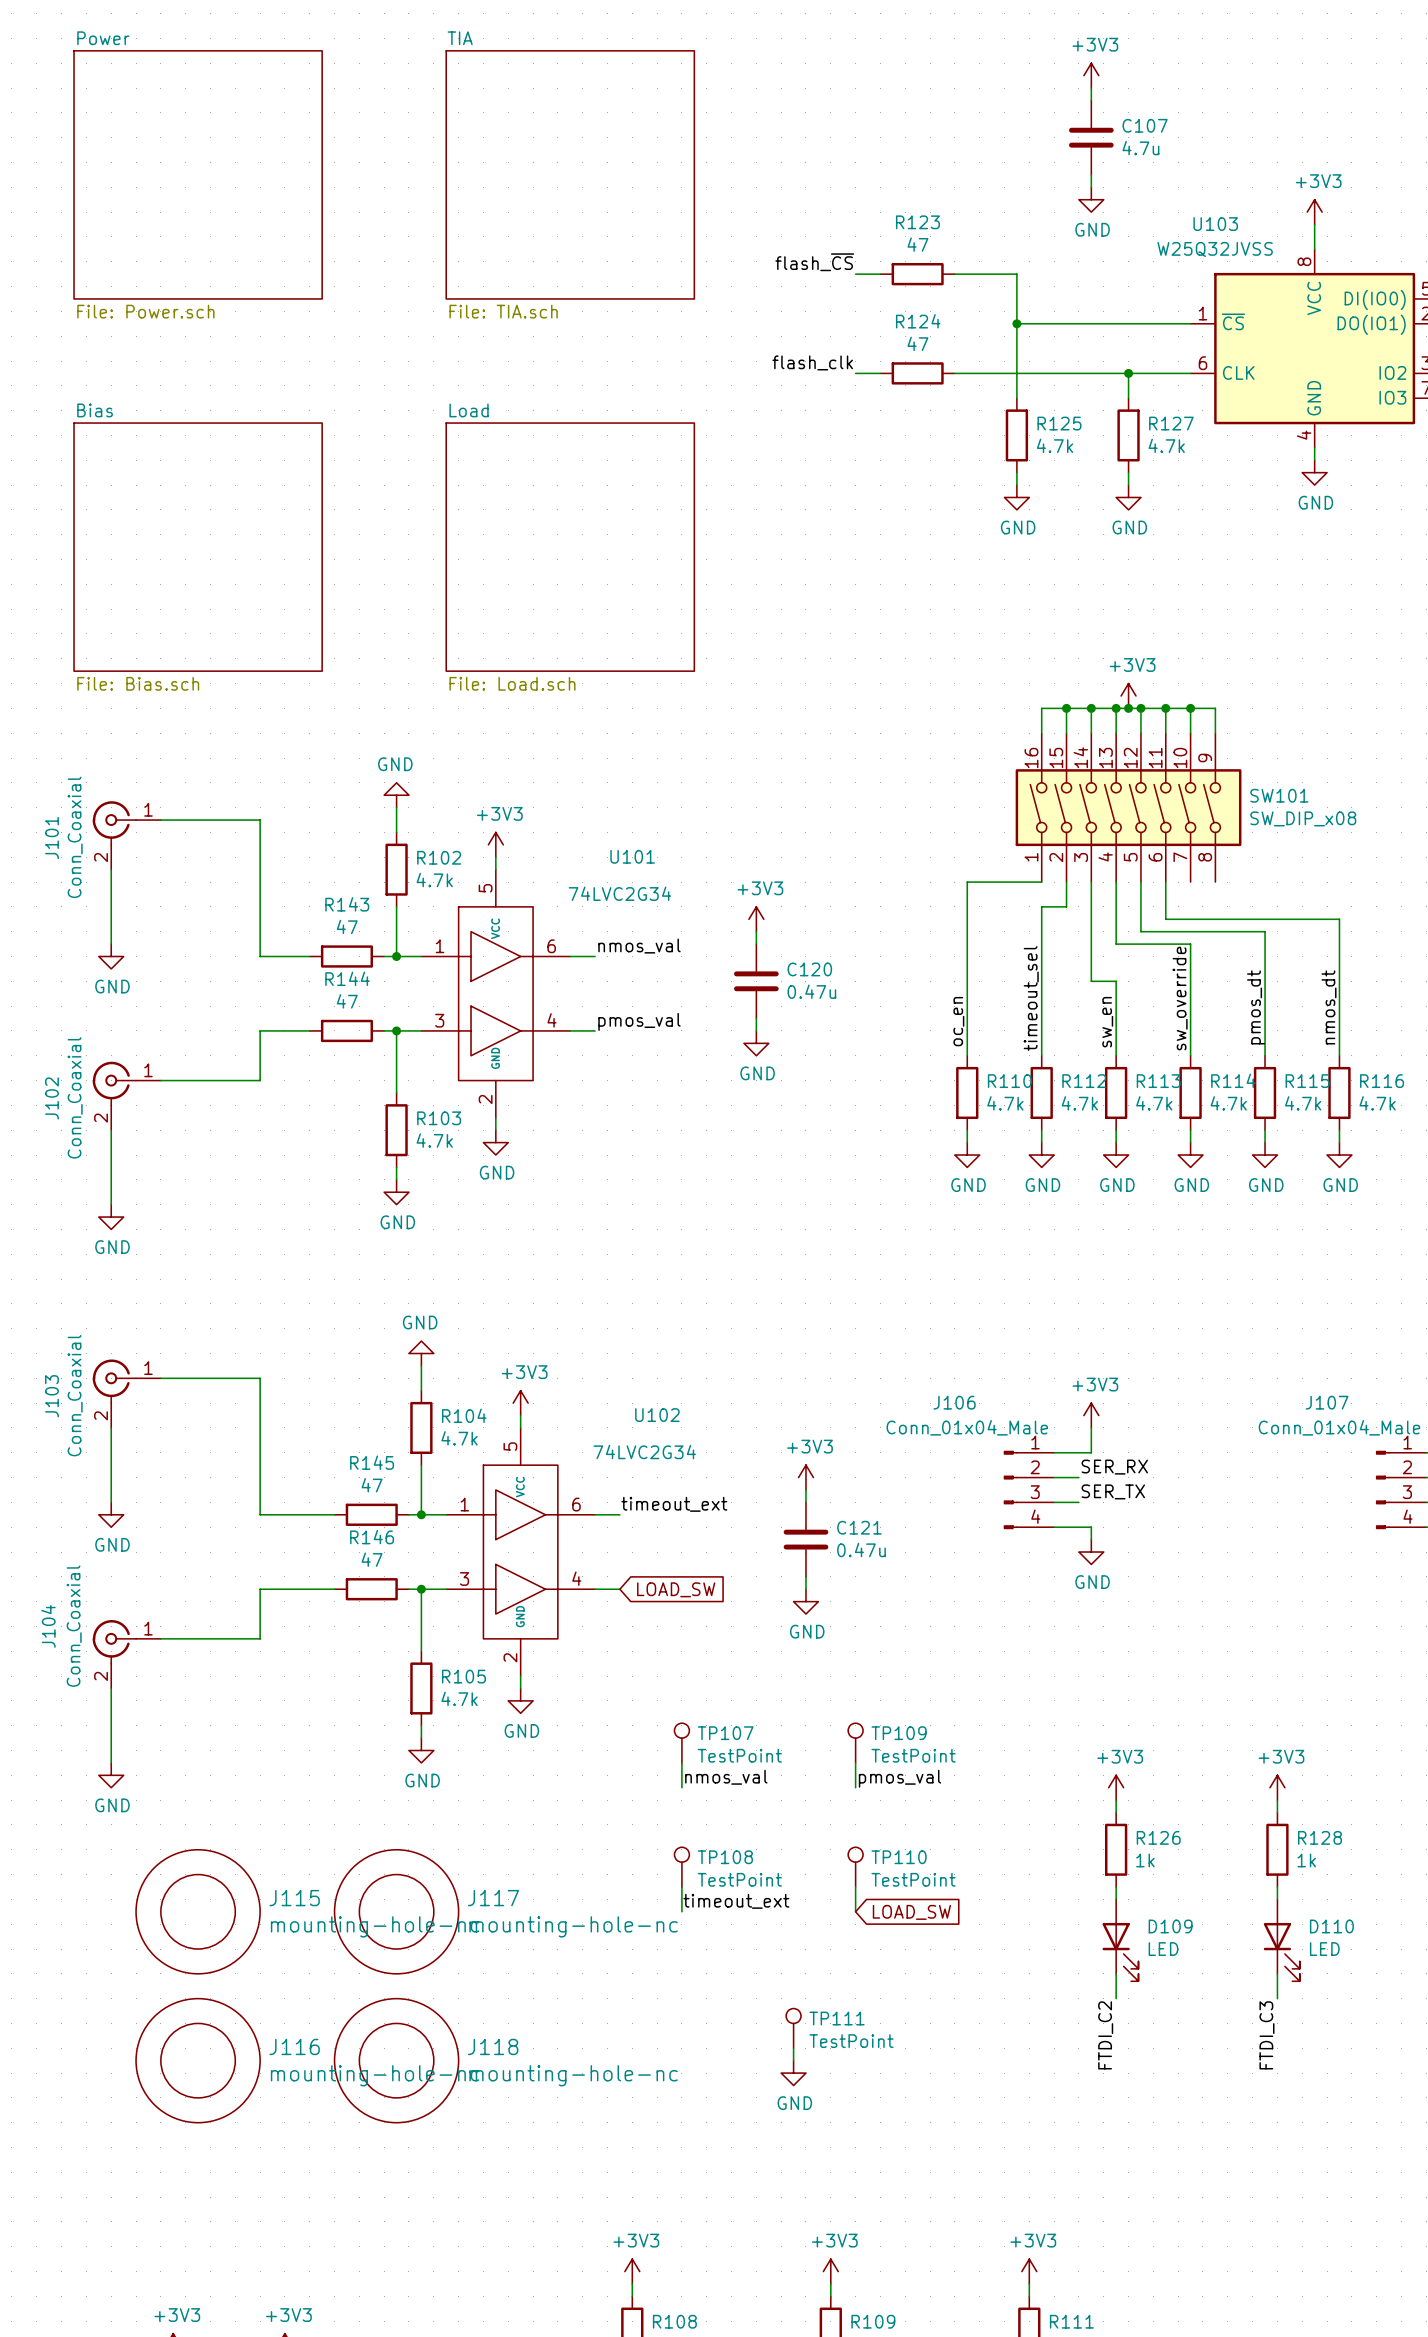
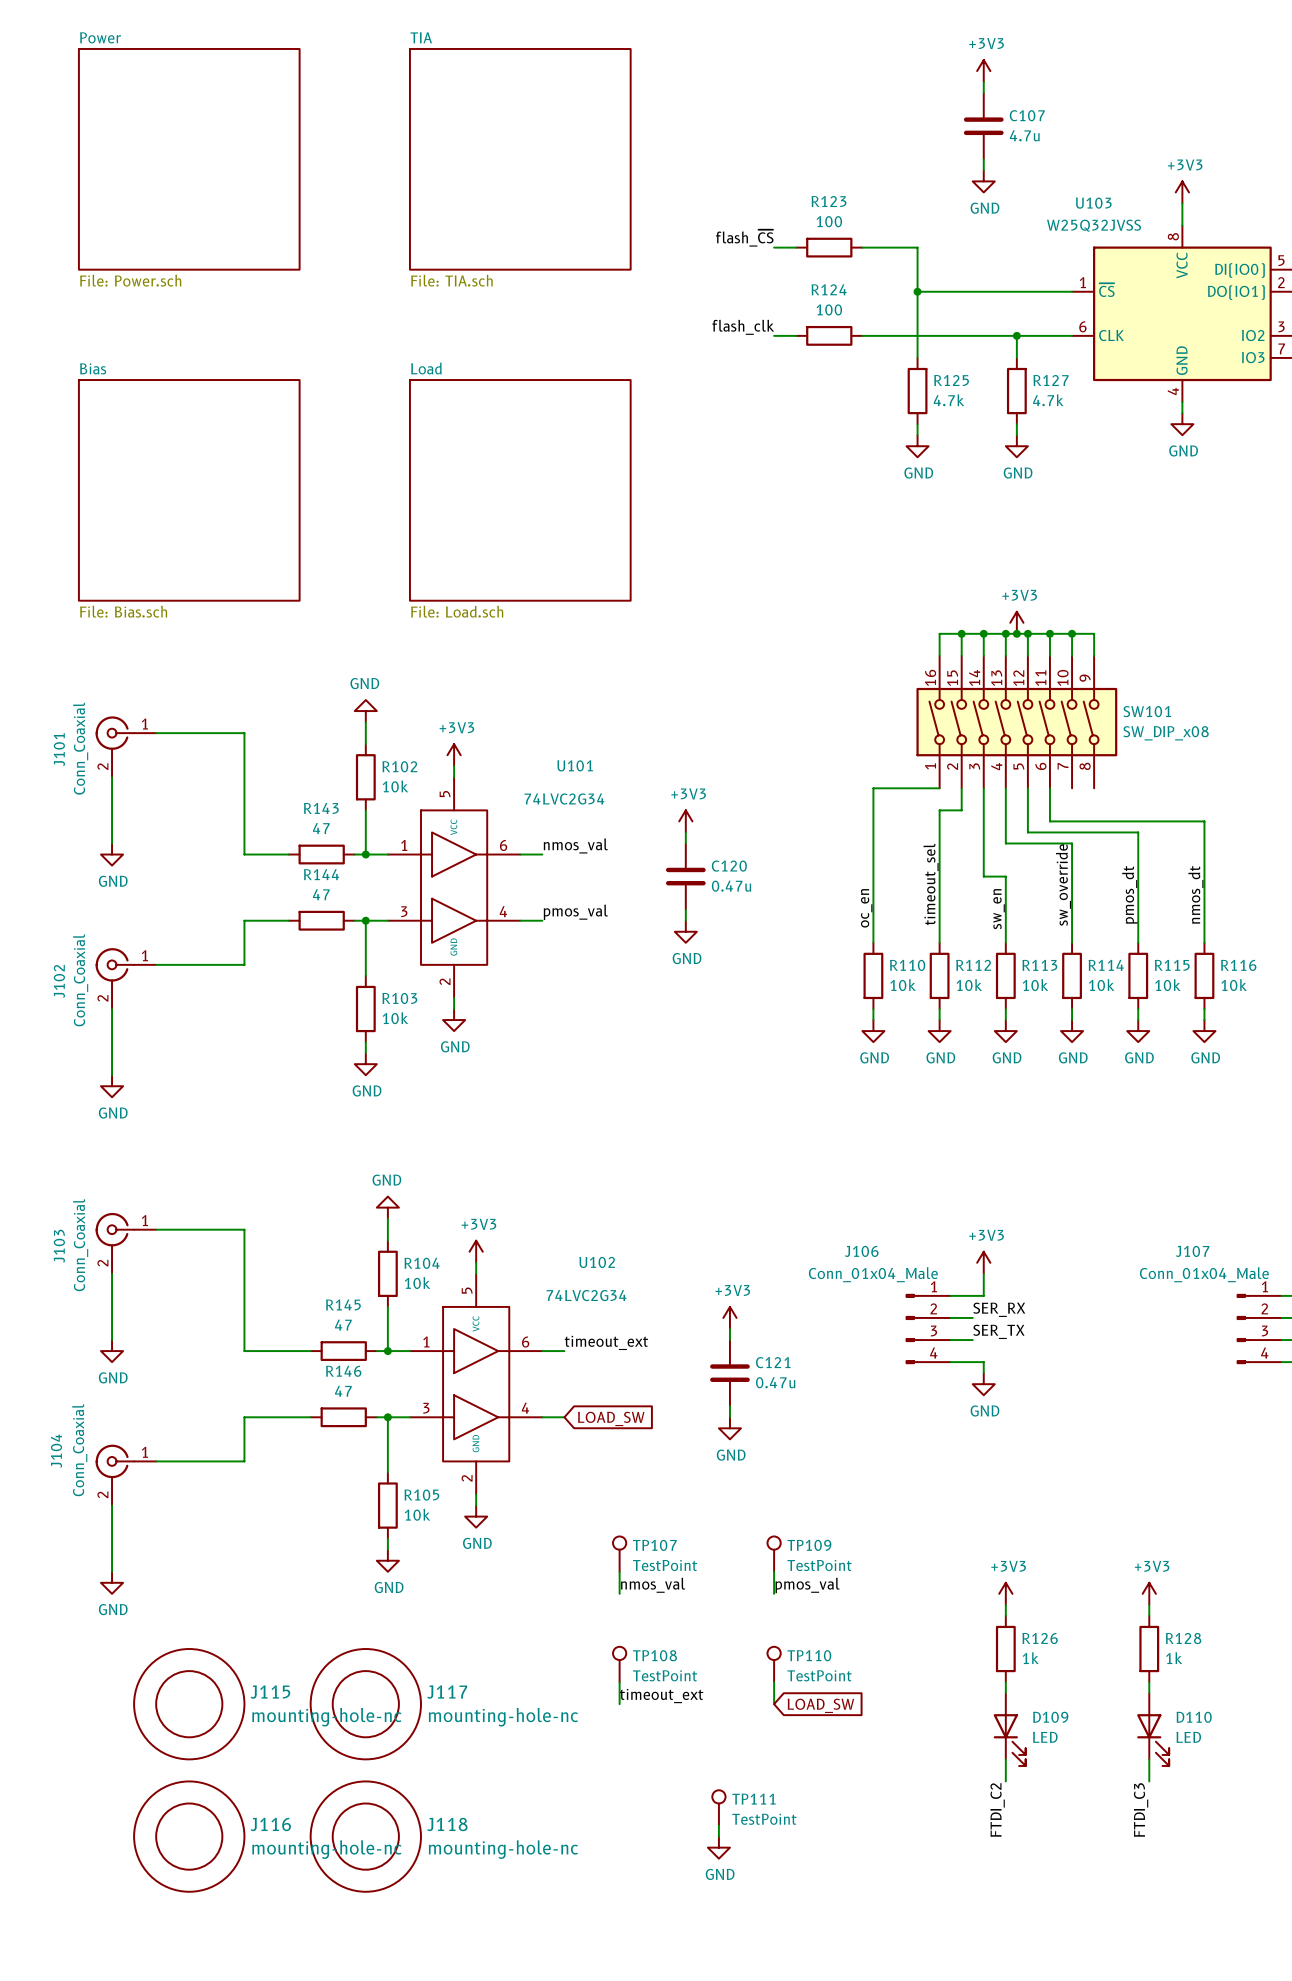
R123 value: 47 (917, 244) -> 100 (829, 221)
R124 value: 47 (917, 343) -> 100 (829, 309)
R102 value: 4.7k (434, 880) -> 10k (395, 786)
R110 value: 4.7k (1005, 1103) -> 10k (903, 985)
R112 value: 4.7k (1079, 1103) -> 10k (969, 985)
R113 value: 4.7k (1154, 1103) -> 10k (1035, 985)
R114 value: 4.7k (1228, 1103) -> 10k (1101, 985)
R115 value: 4.7k (1303, 1103) -> 10k (1167, 985)
R116 value: 4.7k (1377, 1103) -> 10k (1234, 985)
R103 value: 4.7k (434, 1140) -> 10k (395, 1018)
R104 value: 4.7k (459, 1438) -> 10k (417, 1283)
R105 value: 4.7k (459, 1698) -> 10k (417, 1514)

